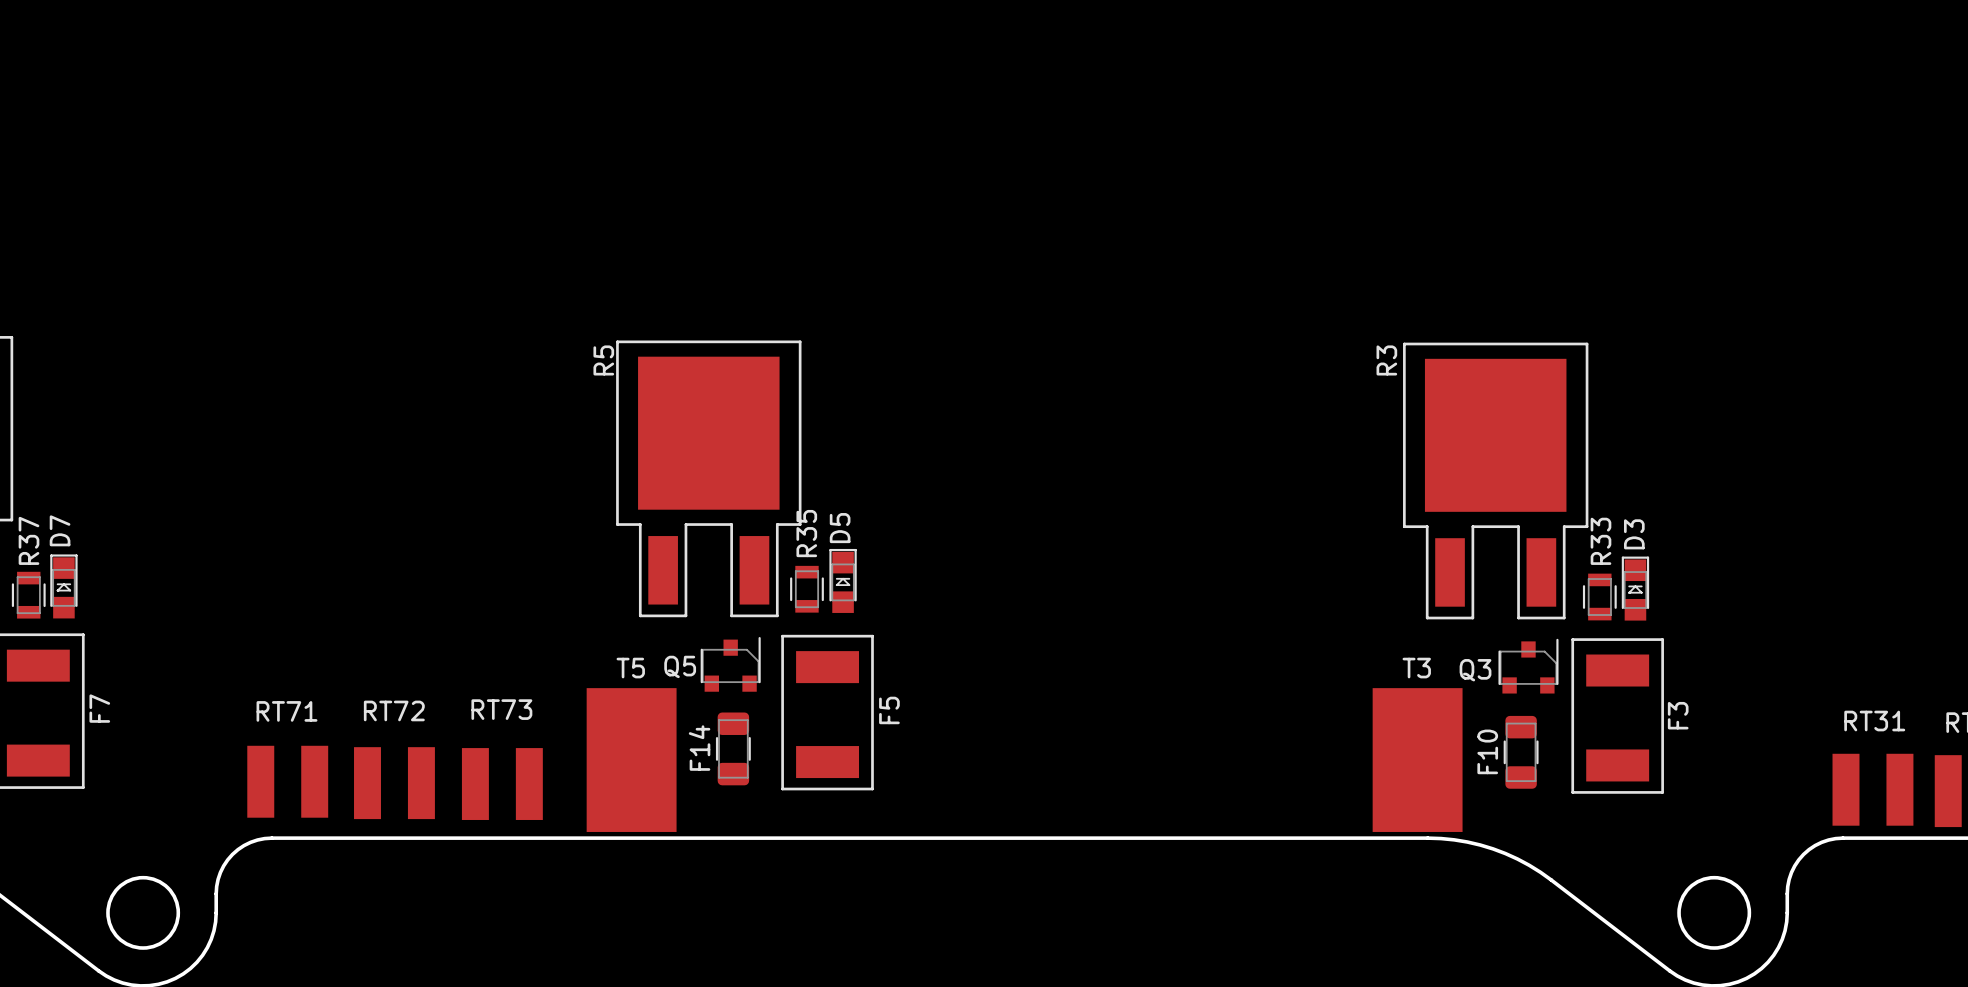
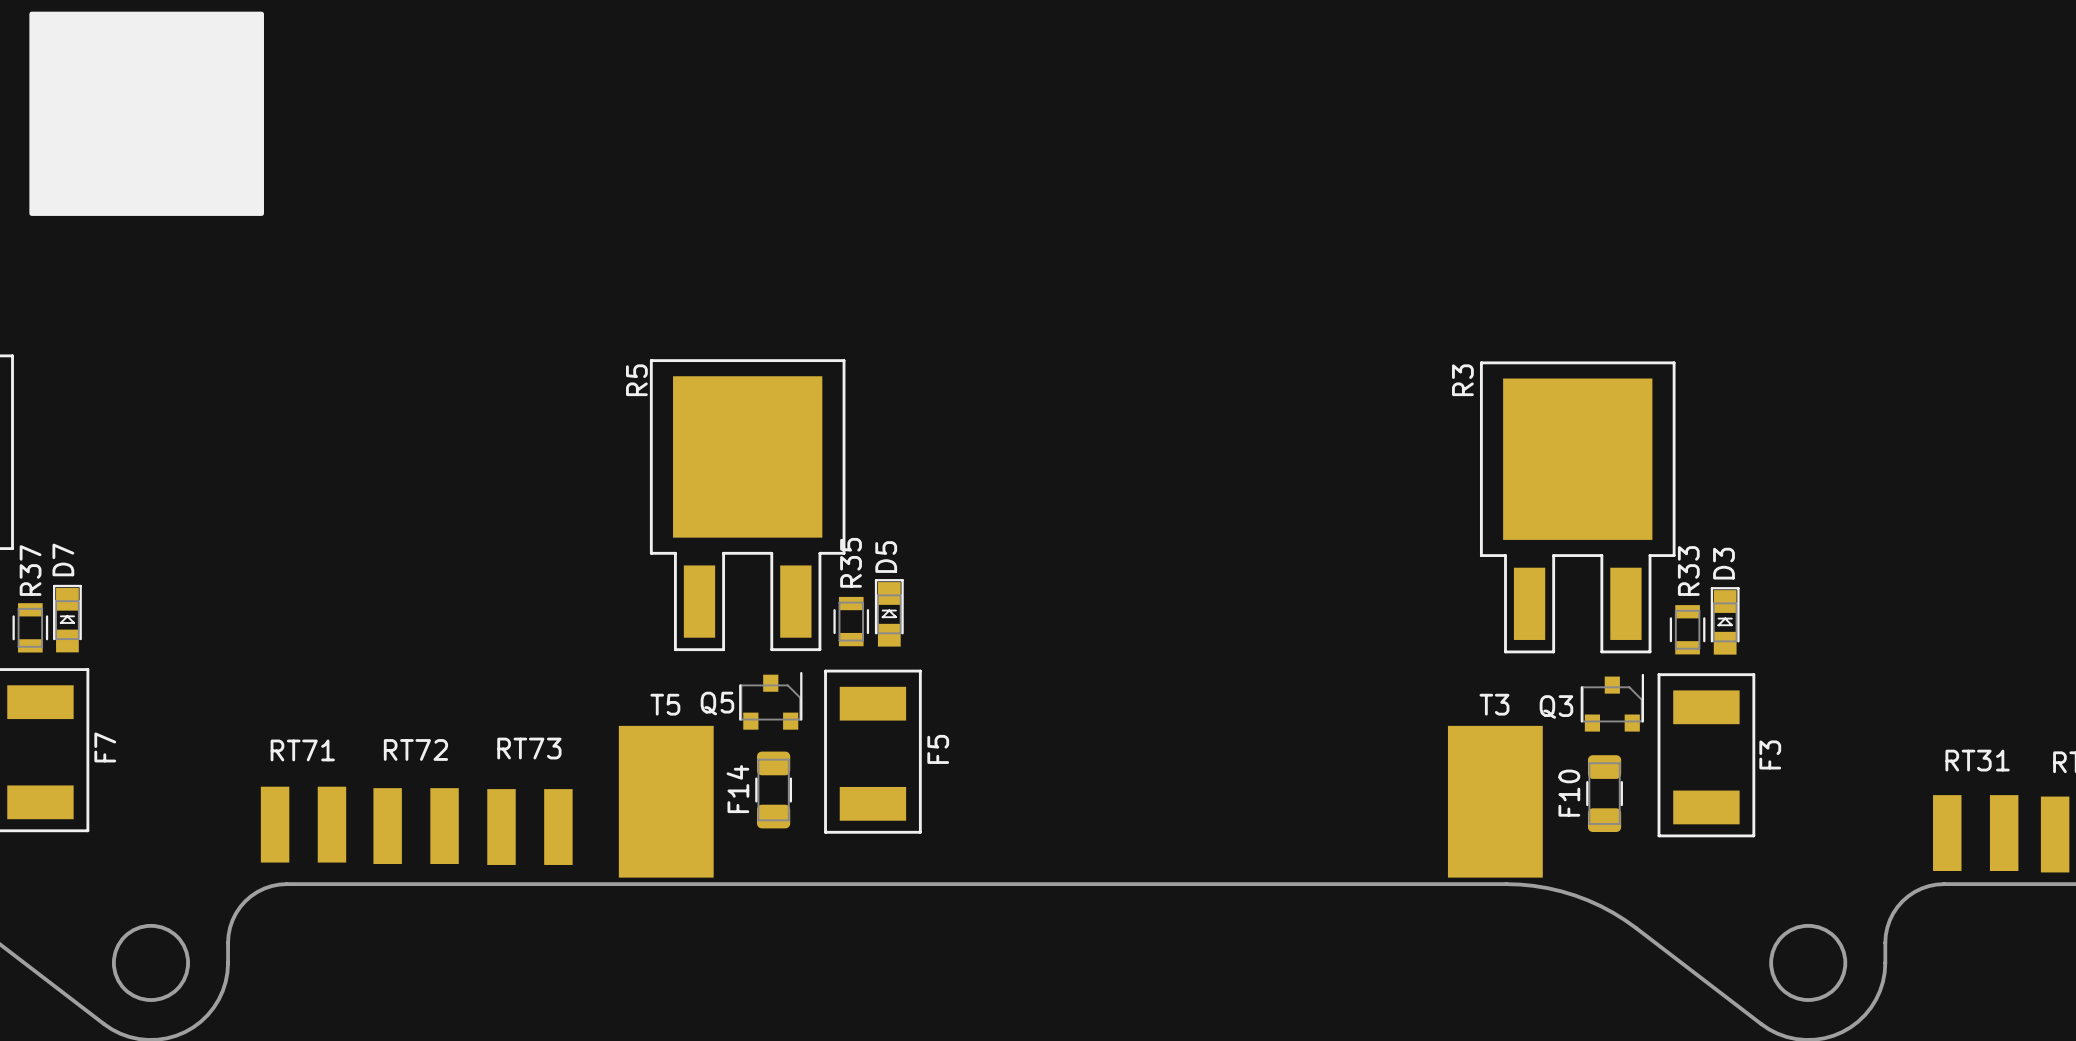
drawing: none -> [29, 11, 264, 216]

